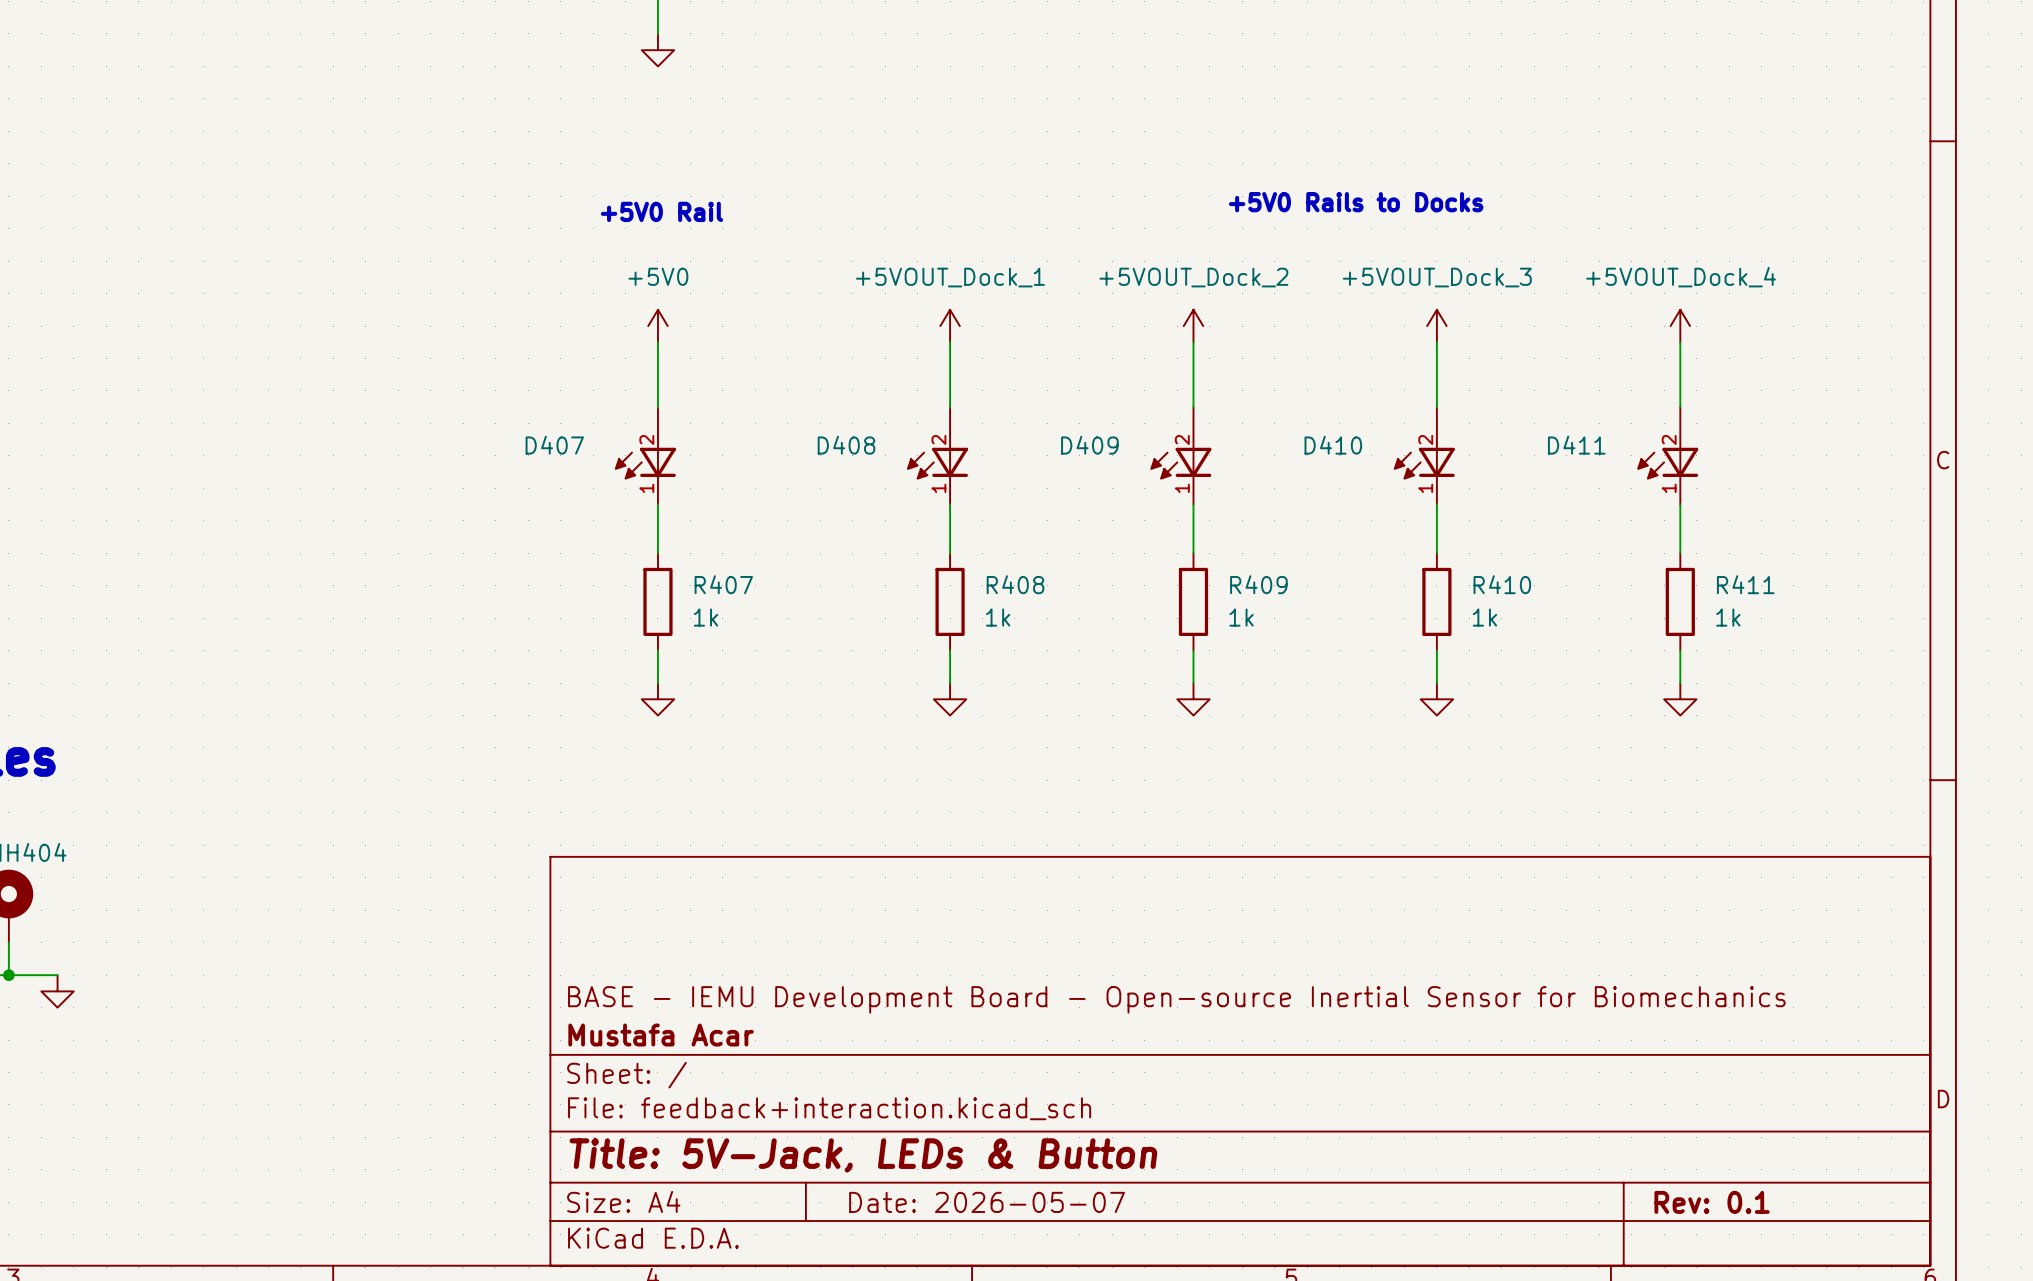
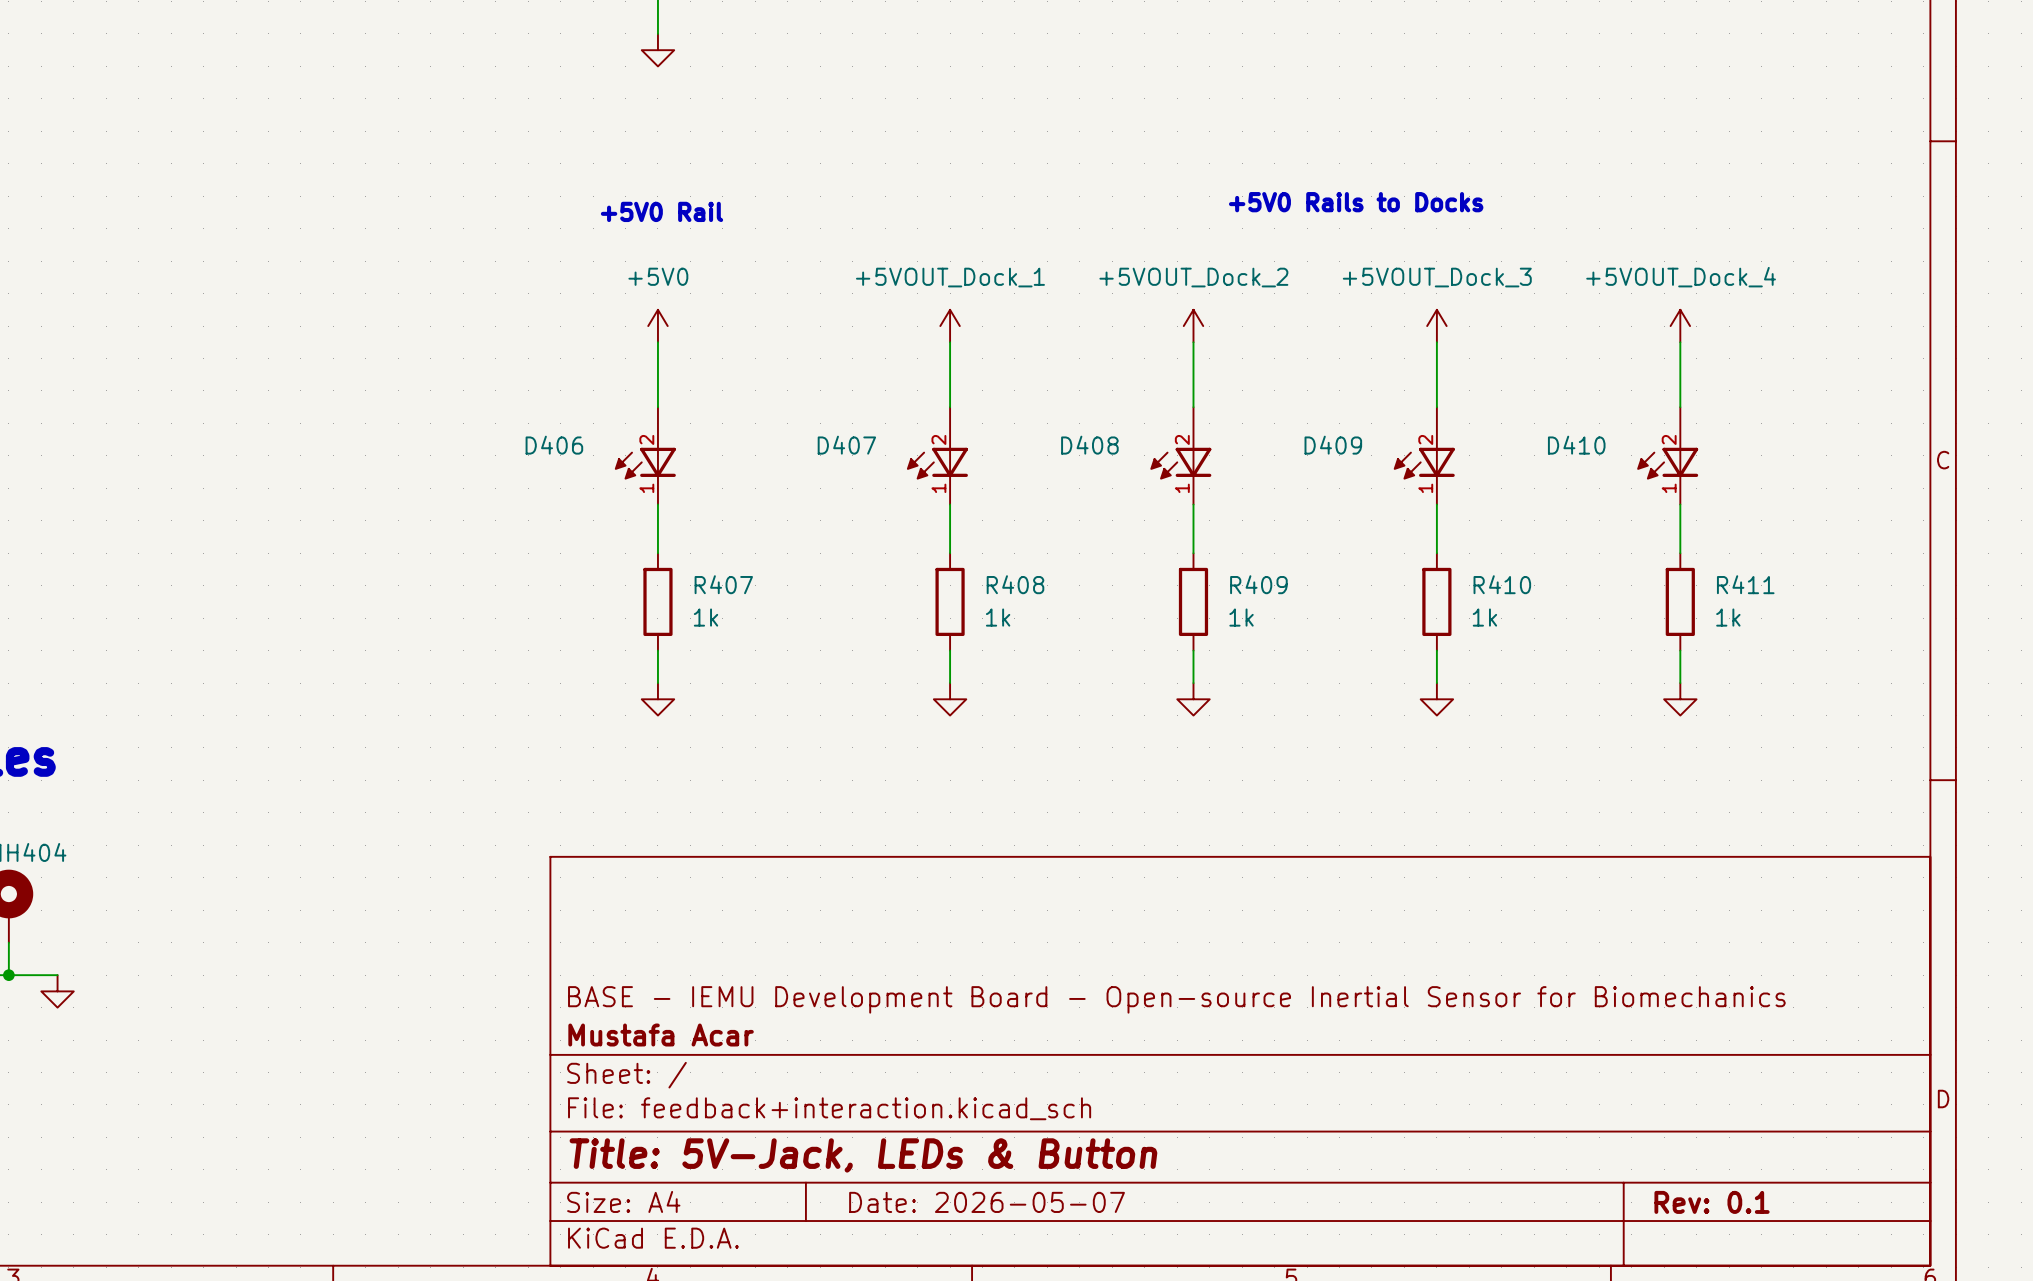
D407 name: D407 (554, 445) -> D406 (554, 445)
D408 name: D408 (846, 445) -> D407 (846, 445)
D409 name: D409 (1089, 445) -> D408 (1089, 445)
D410 name: D410 (1333, 445) -> D409 (1333, 445)
D411 name: D411 (1576, 445) -> D410 (1576, 445)

